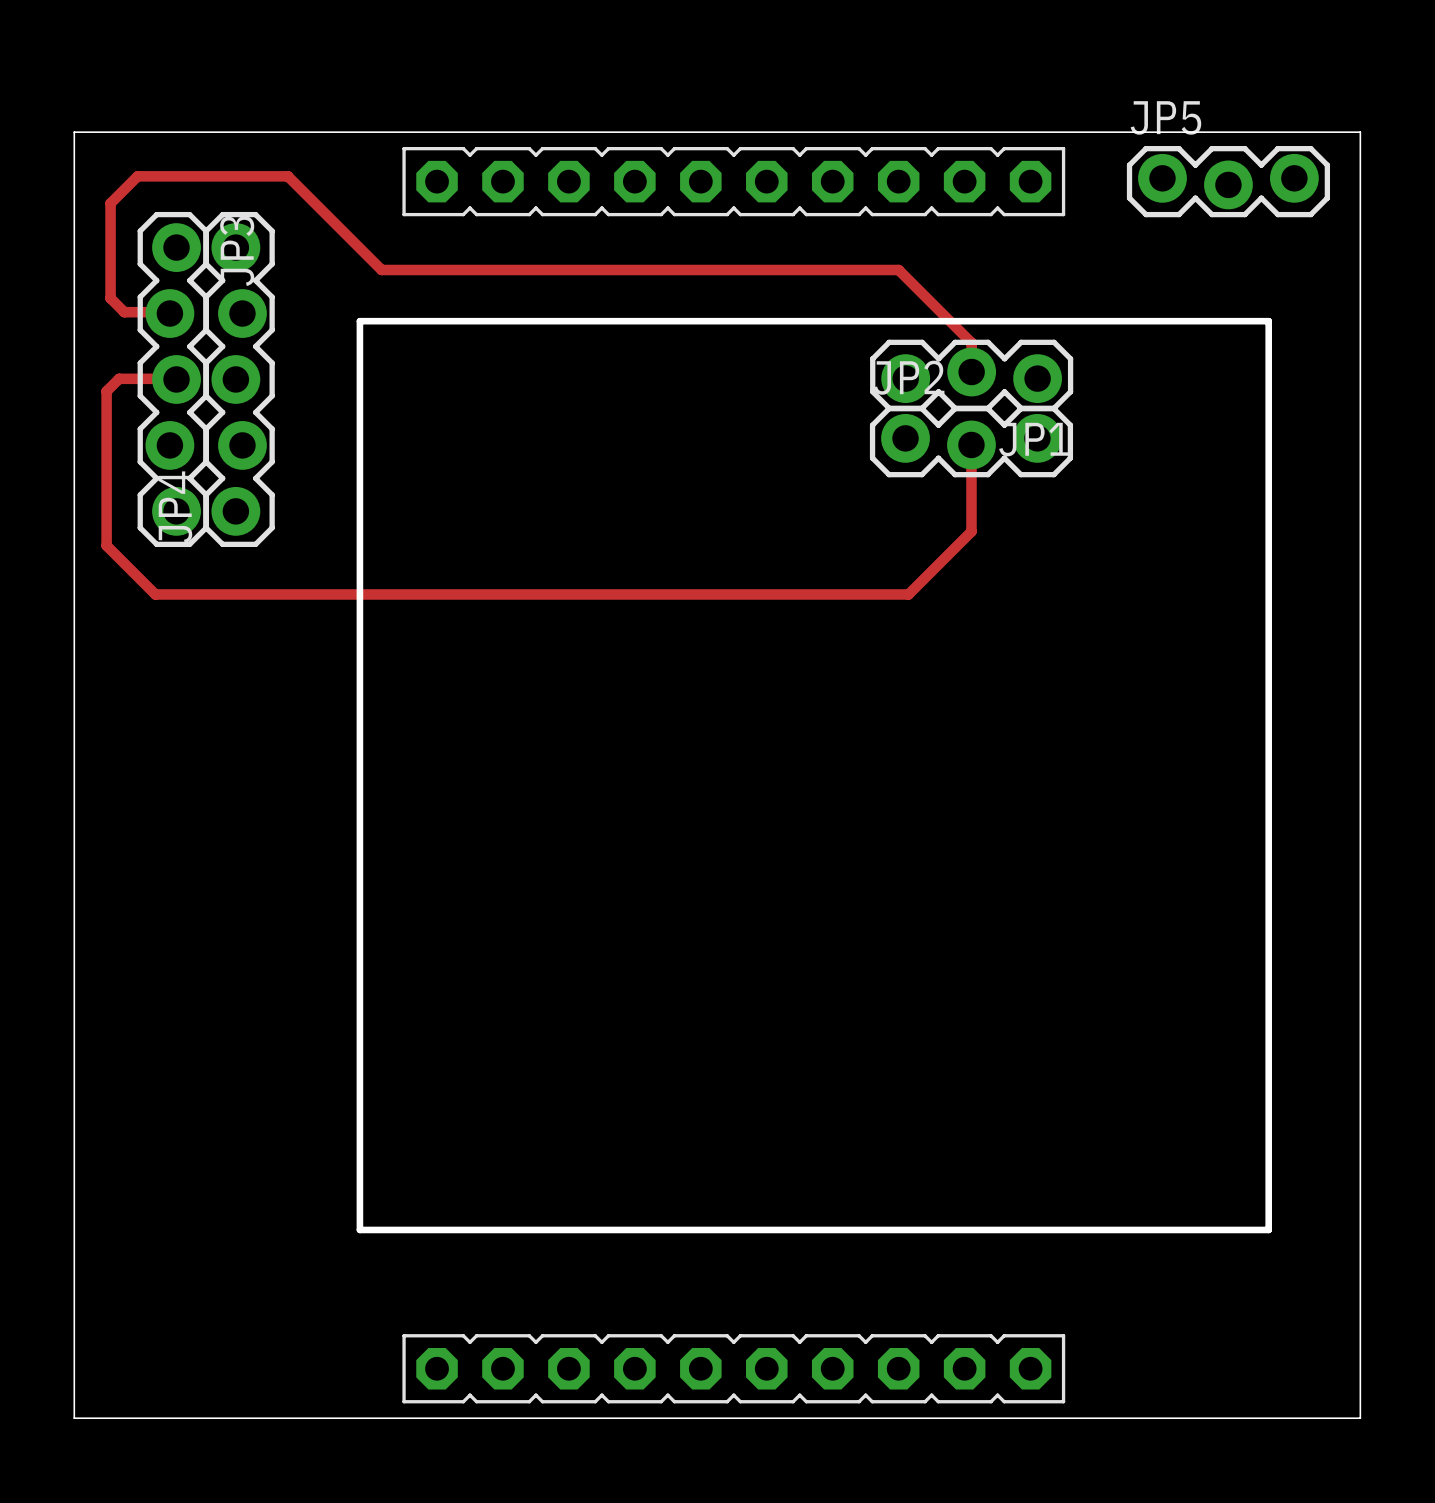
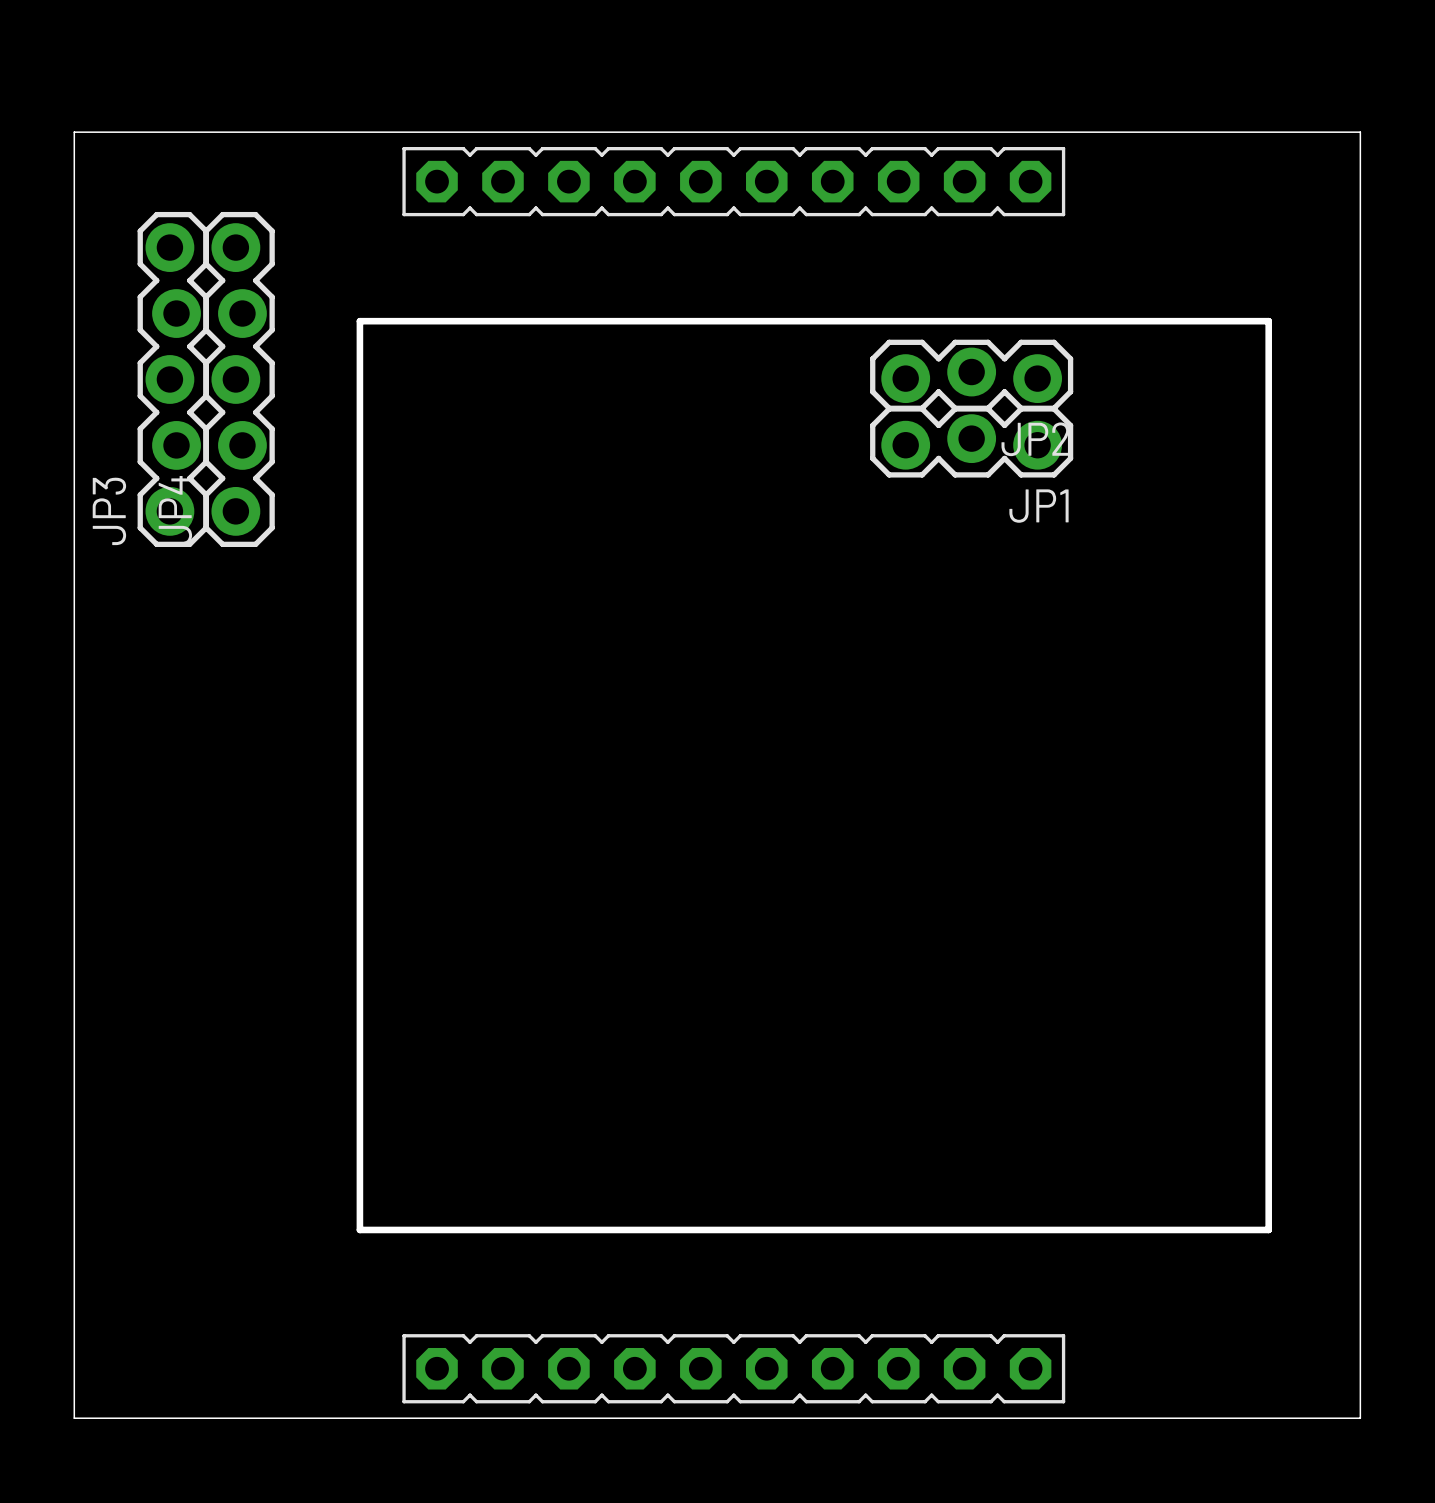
JP5: (1228, 181) -> none
track: (169, 313) (124, 312) (110, 298) (110, 203) (137, 176) (287, 176) (381, 270) (898, 270) (971, 342) (971, 372) -> none
JP3 rotation: 0° (173, 379) -> 180° (173, 379)
track: (176, 379) (119, 378) (106, 391) (106, 545) (155, 594) (908, 594) (971, 531) (971, 444) -> none
JP1 name: JP1 (1034, 439) -> JP2 (1035, 439)
JP2: (971, 441) -> none
JP1: none -> (971, 441)

